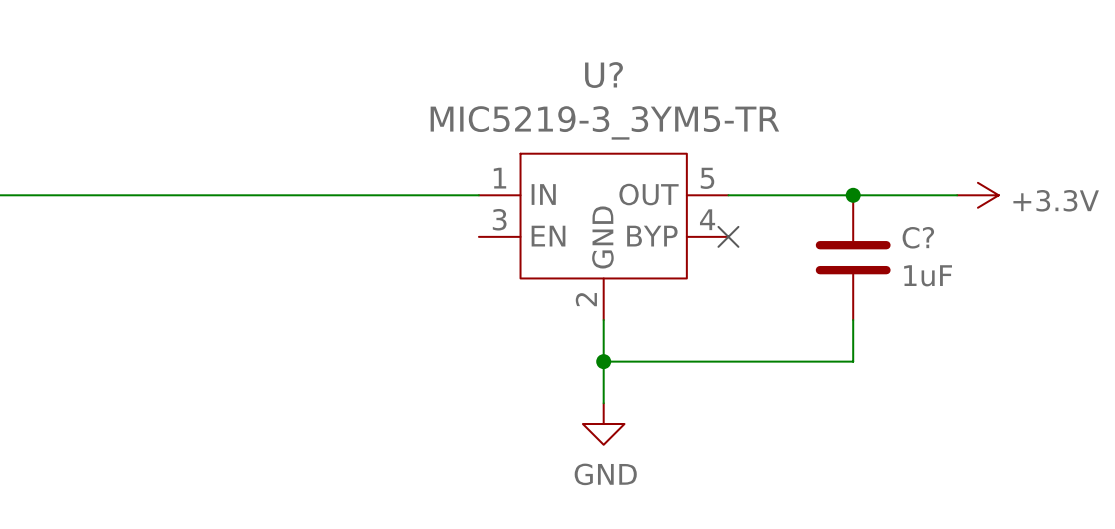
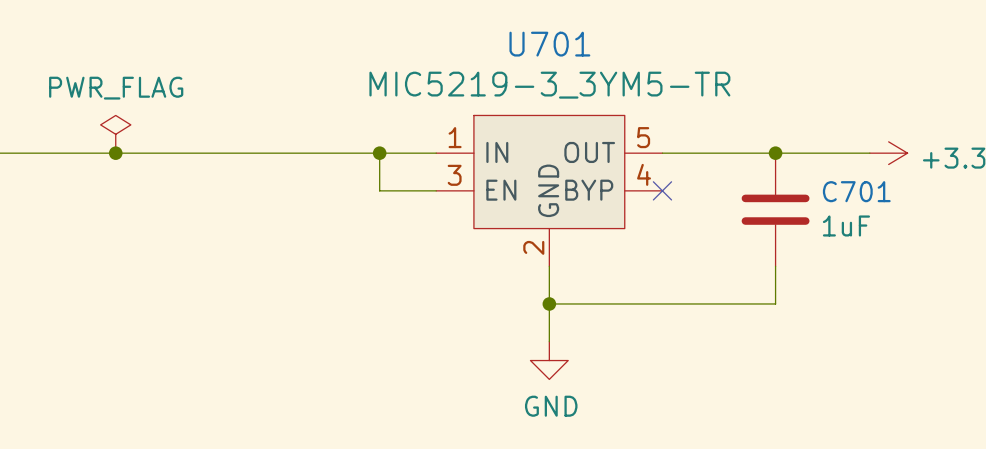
U? name: U? (603, 75) -> U701 (549, 44)
power symbol: none -> PWR_FLAG (115, 134)
junction: none -> (115, 153)
wire: none -> (379, 153) (379, 190) (436, 190)
junction: none -> (379, 153)
C? name: C? (918, 237) -> C701 (856, 191)

